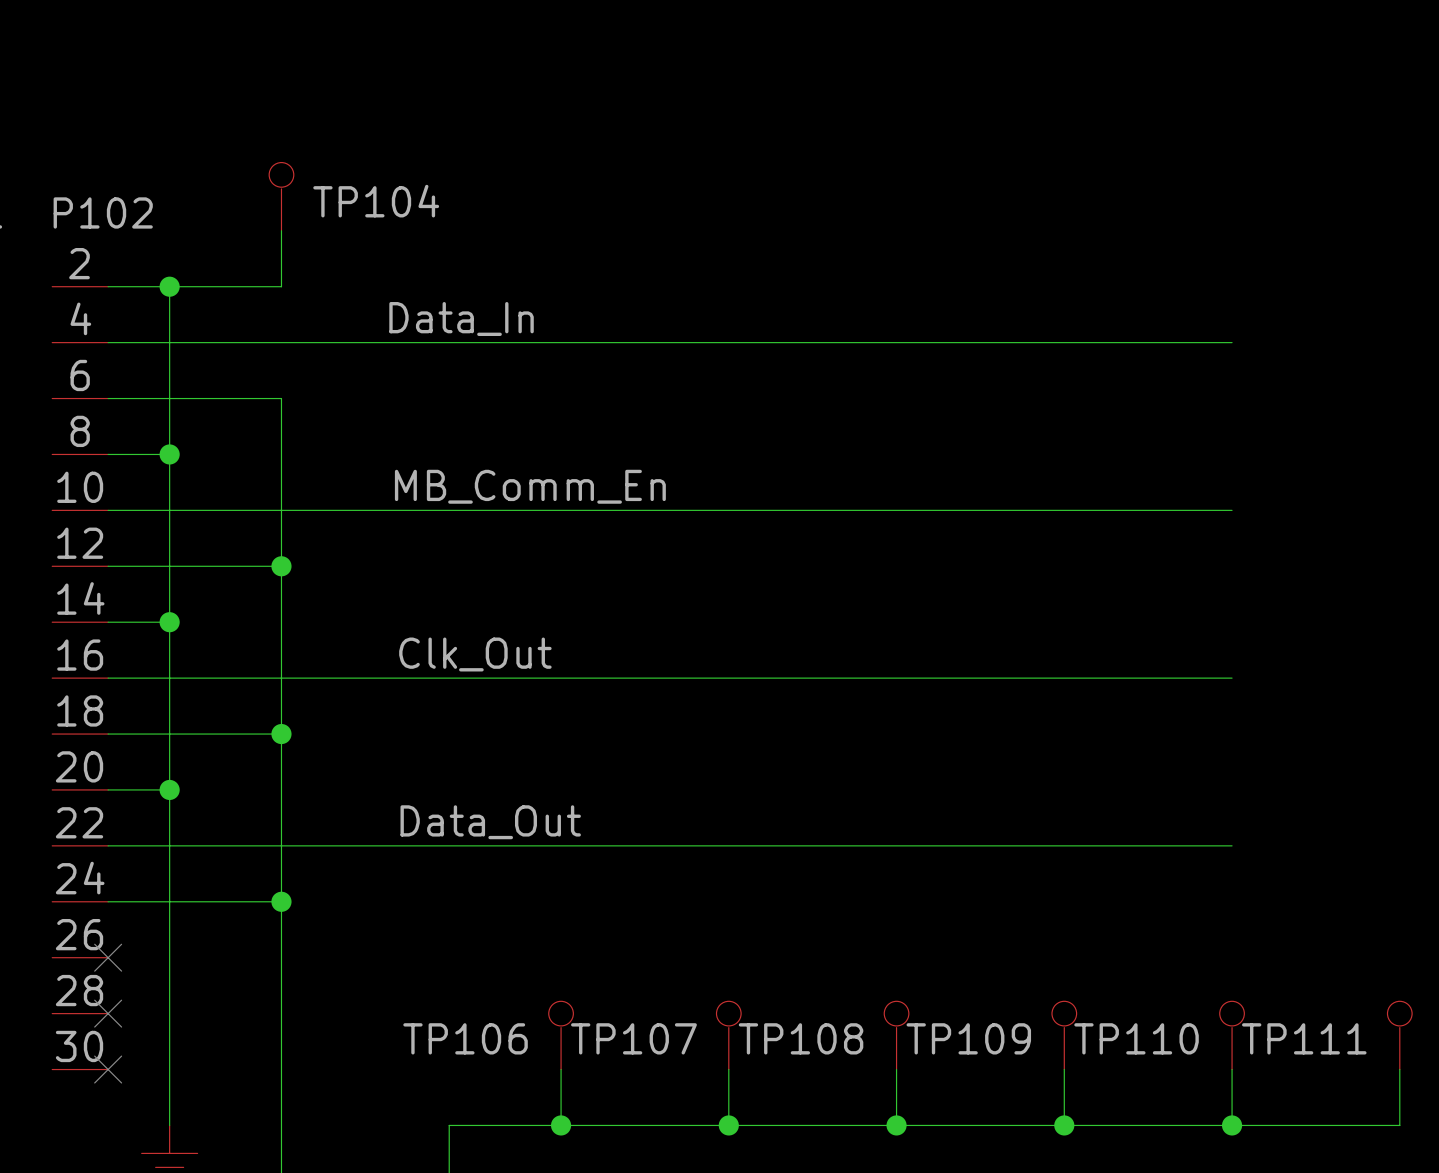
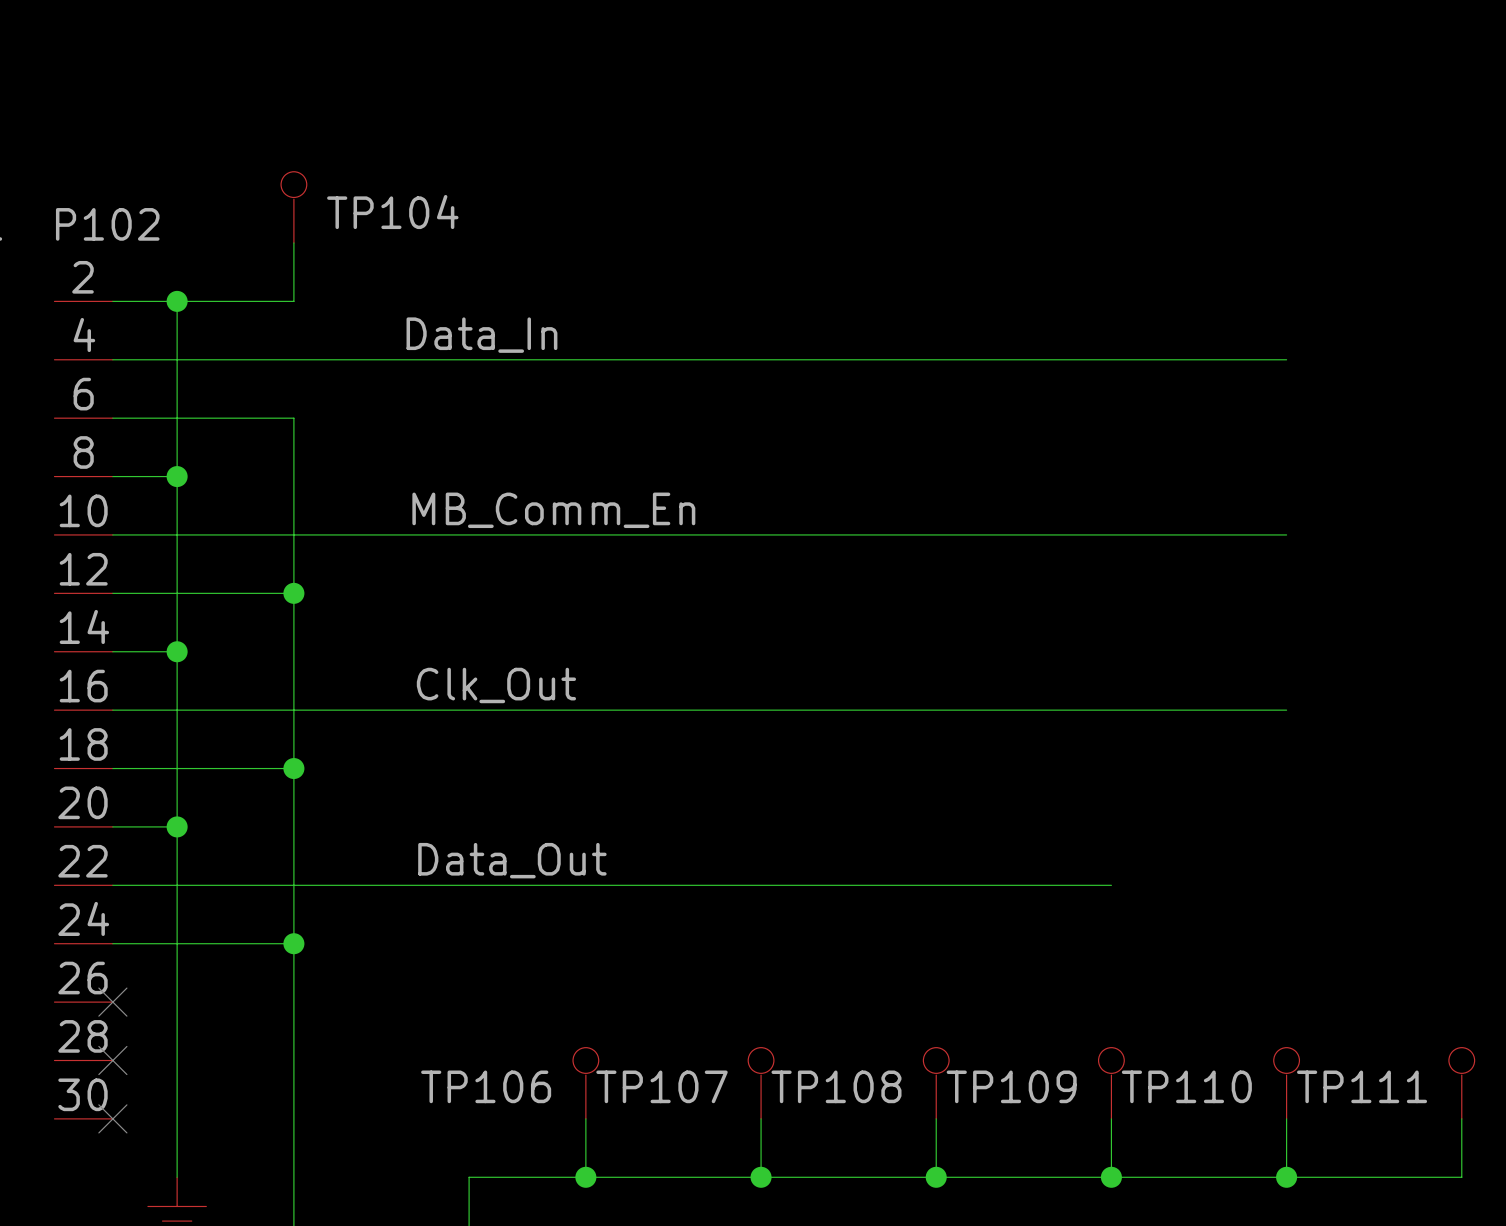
wire: (1064, 845) (1232, 845) -> none

